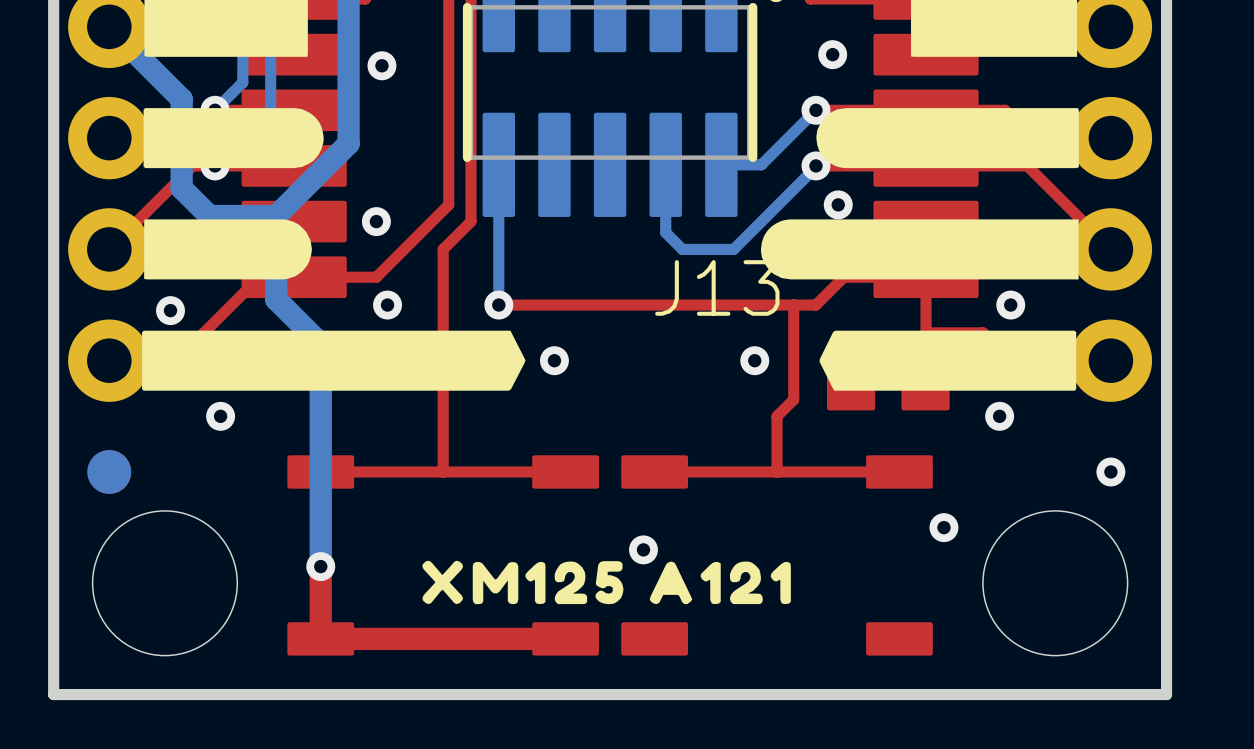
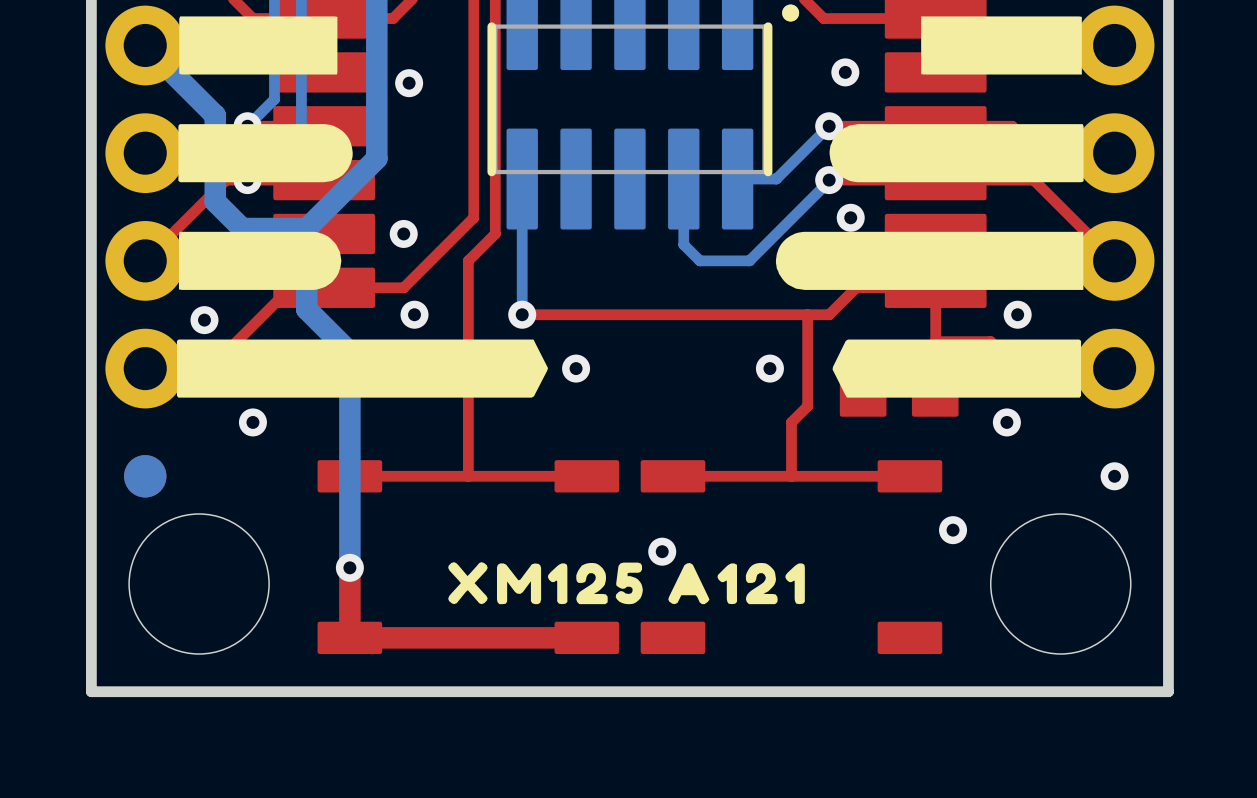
J13 name: J13 (717, 287) -> none

